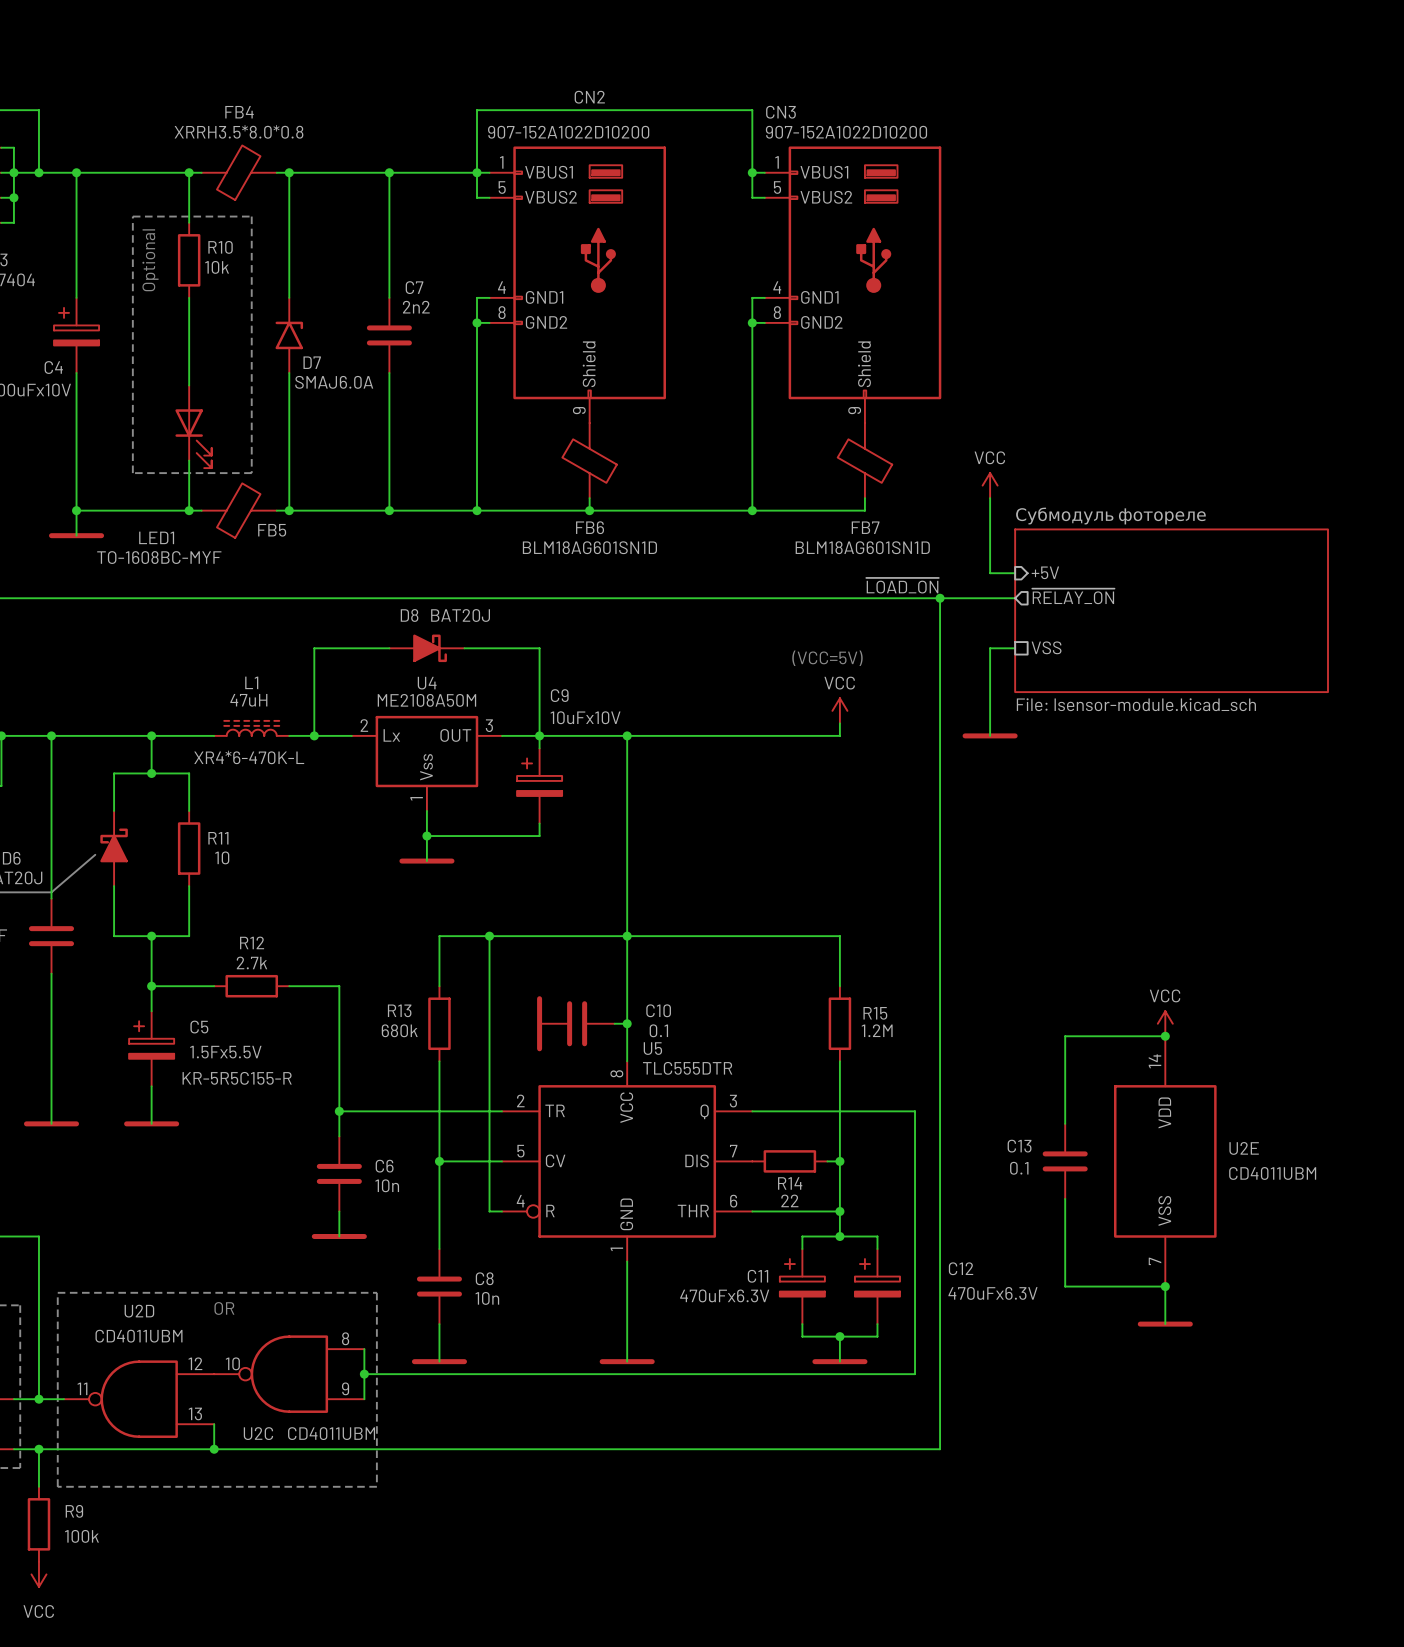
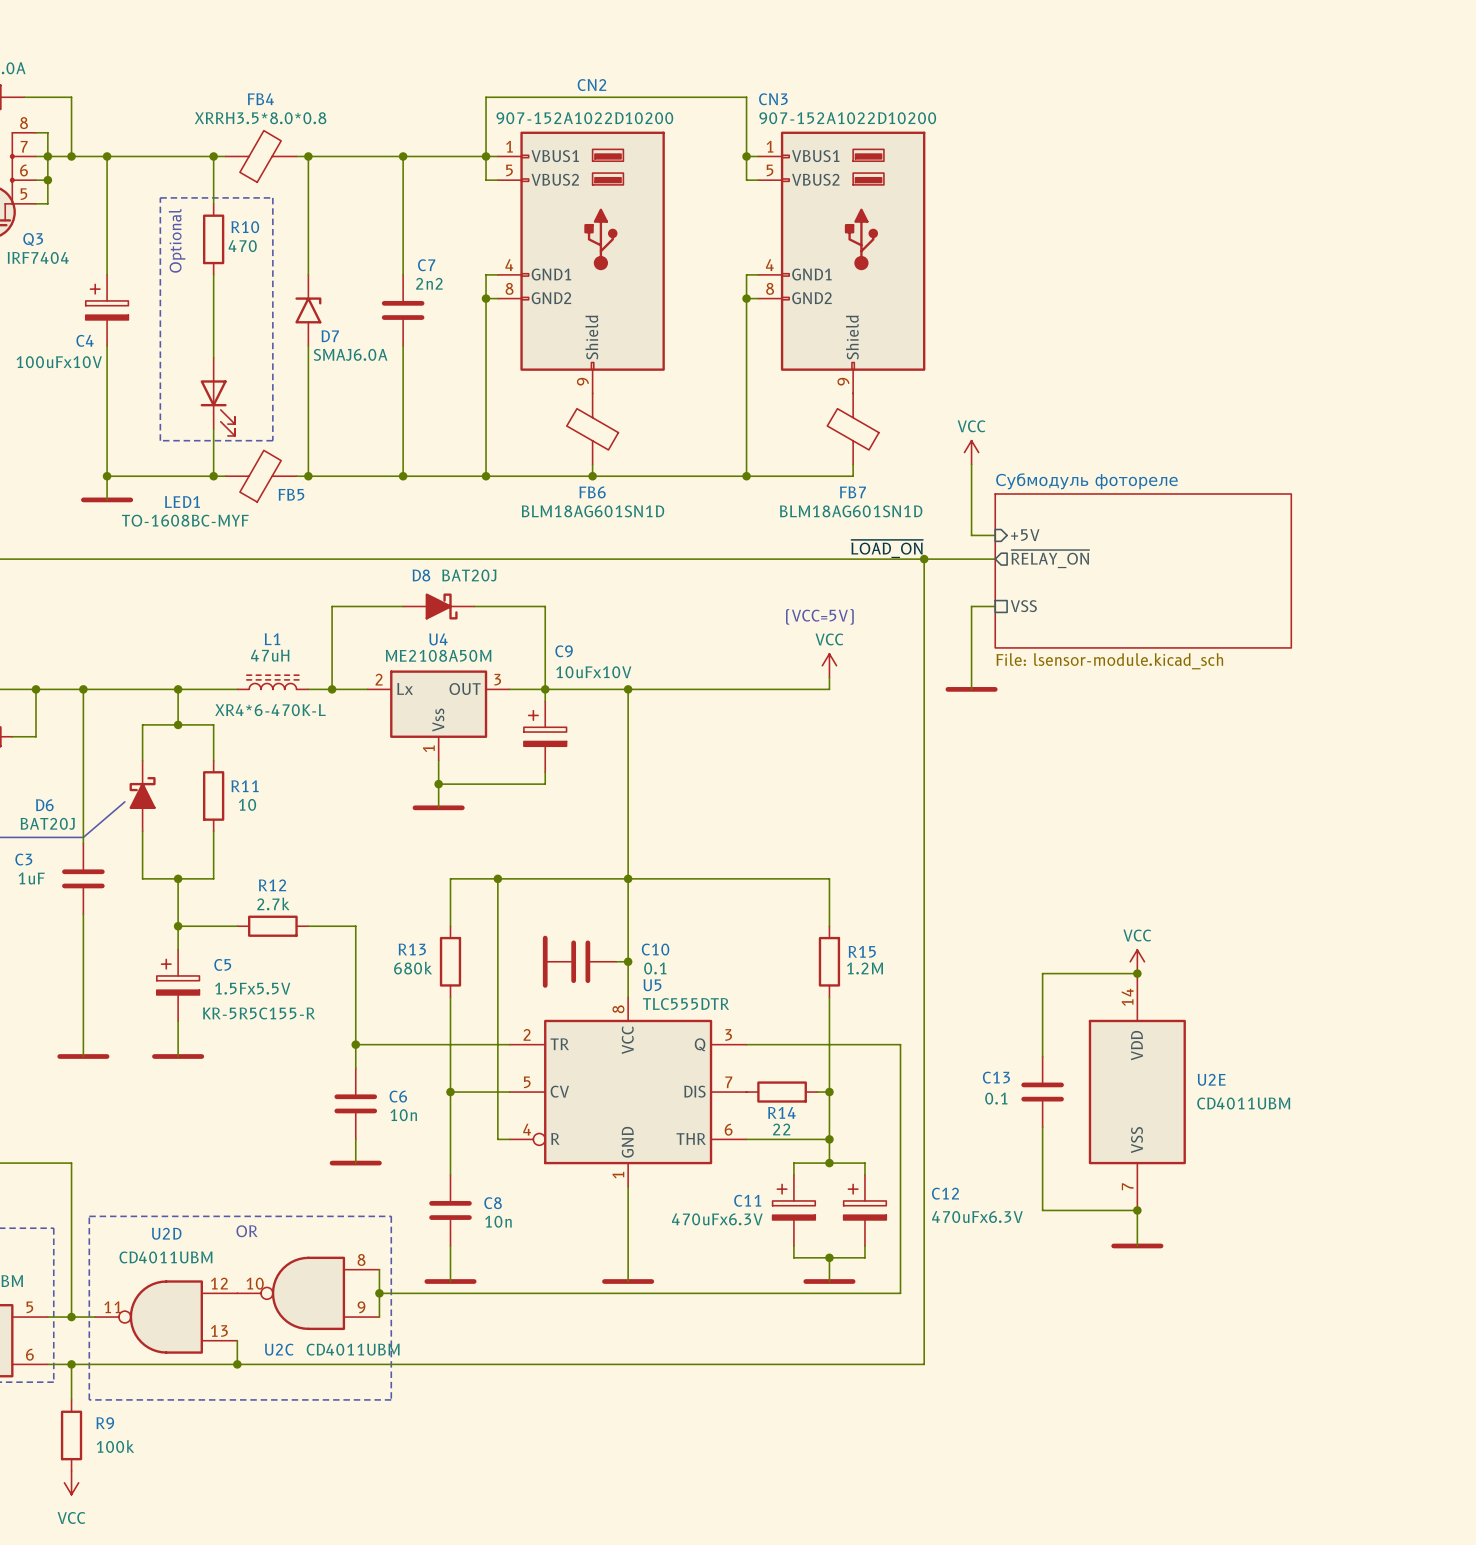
R10 value: 10k (217, 267) -> 470 (242, 246)

